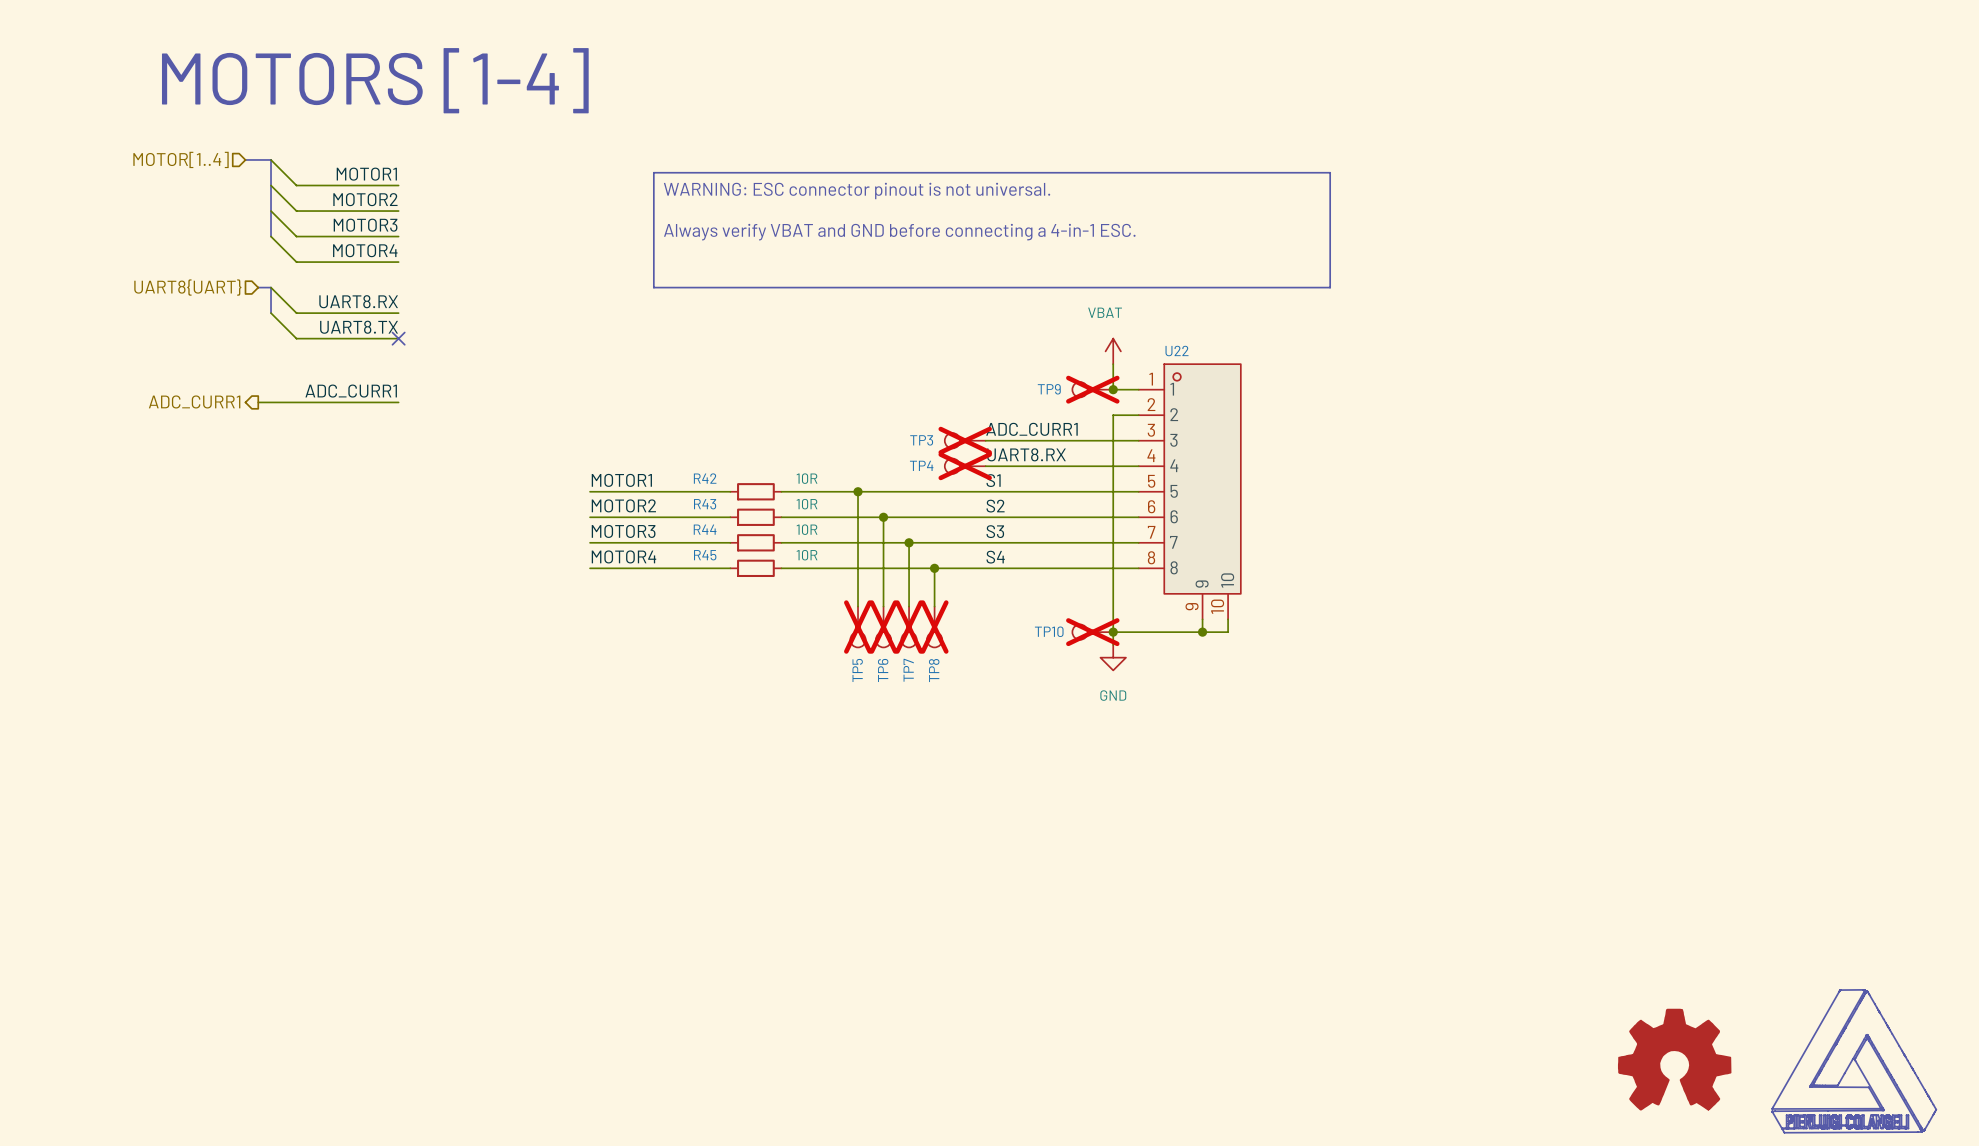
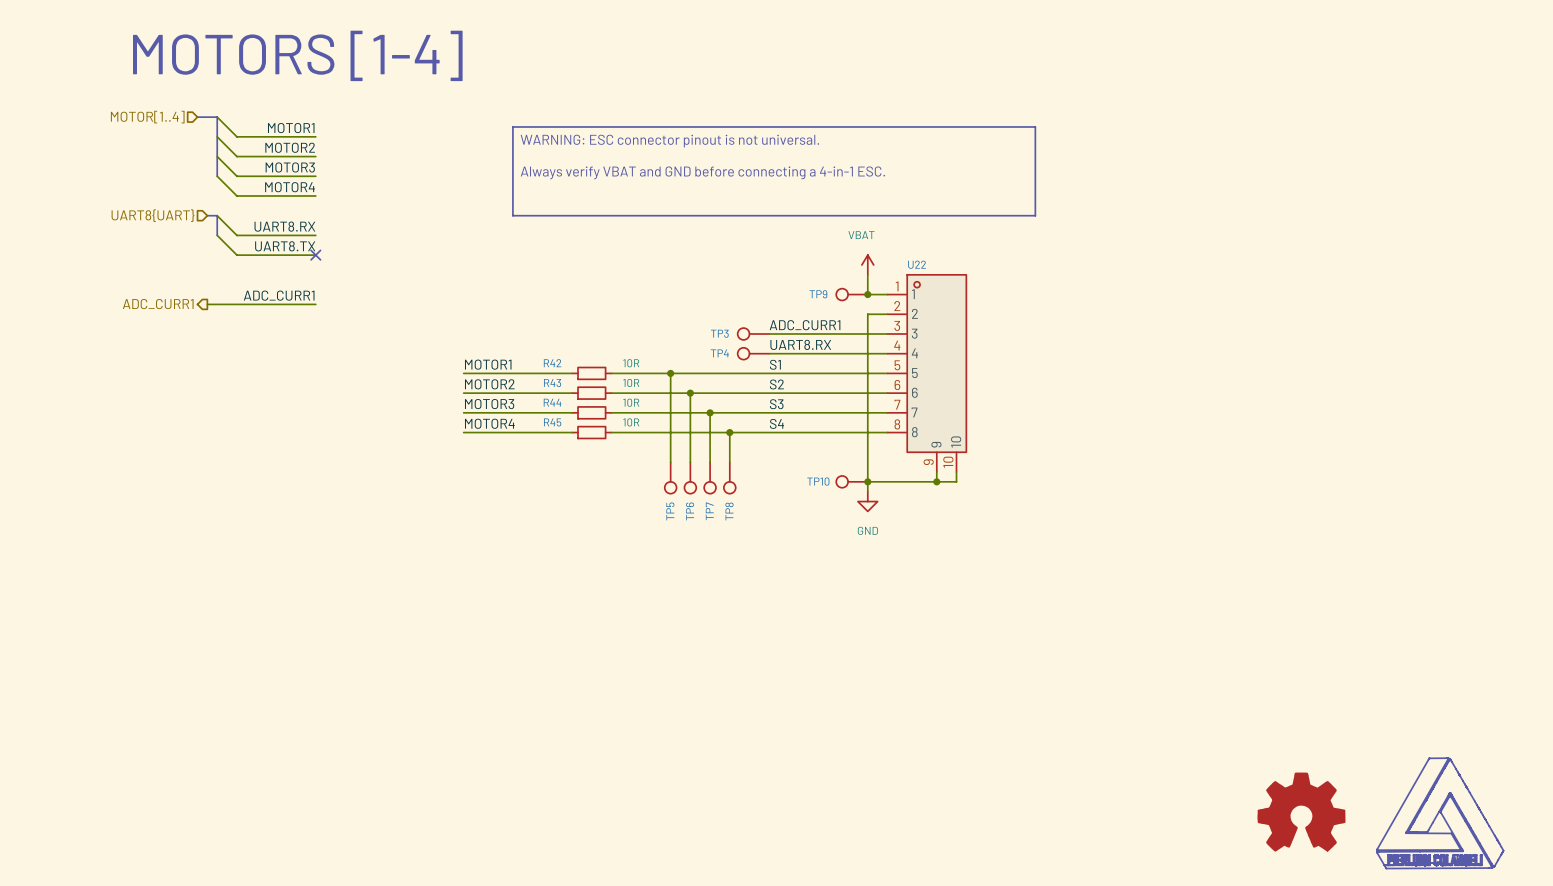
TP9 do-not-place cross: (1092, 389) -> none
TP3 do-not-place cross: (965, 440) -> none
TP4 do-not-place cross: (965, 466) -> none
TP5 do-not-place cross: (858, 627) -> none
TP6 do-not-place cross: (883, 627) -> none
TP7 do-not-place cross: (909, 627) -> none
TP8 do-not-place cross: (934, 627) -> none
TP10 do-not-place cross: (1092, 632) -> none

